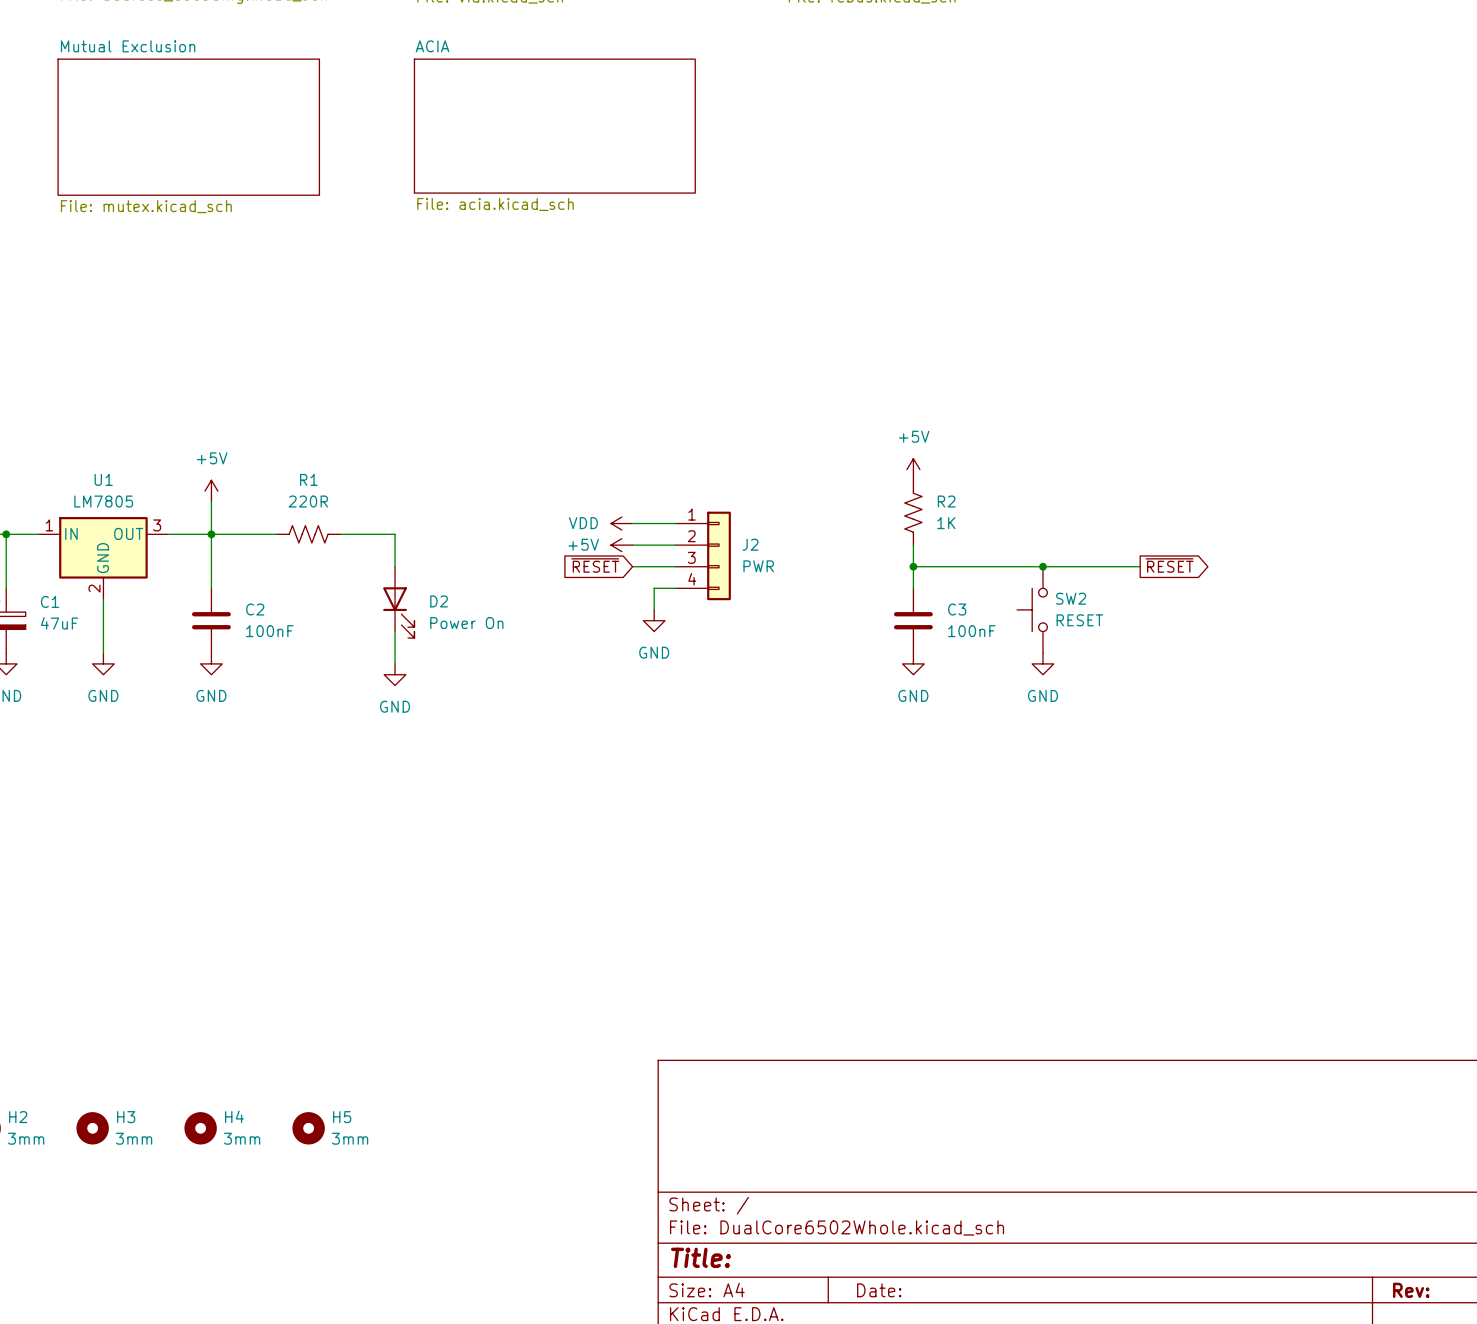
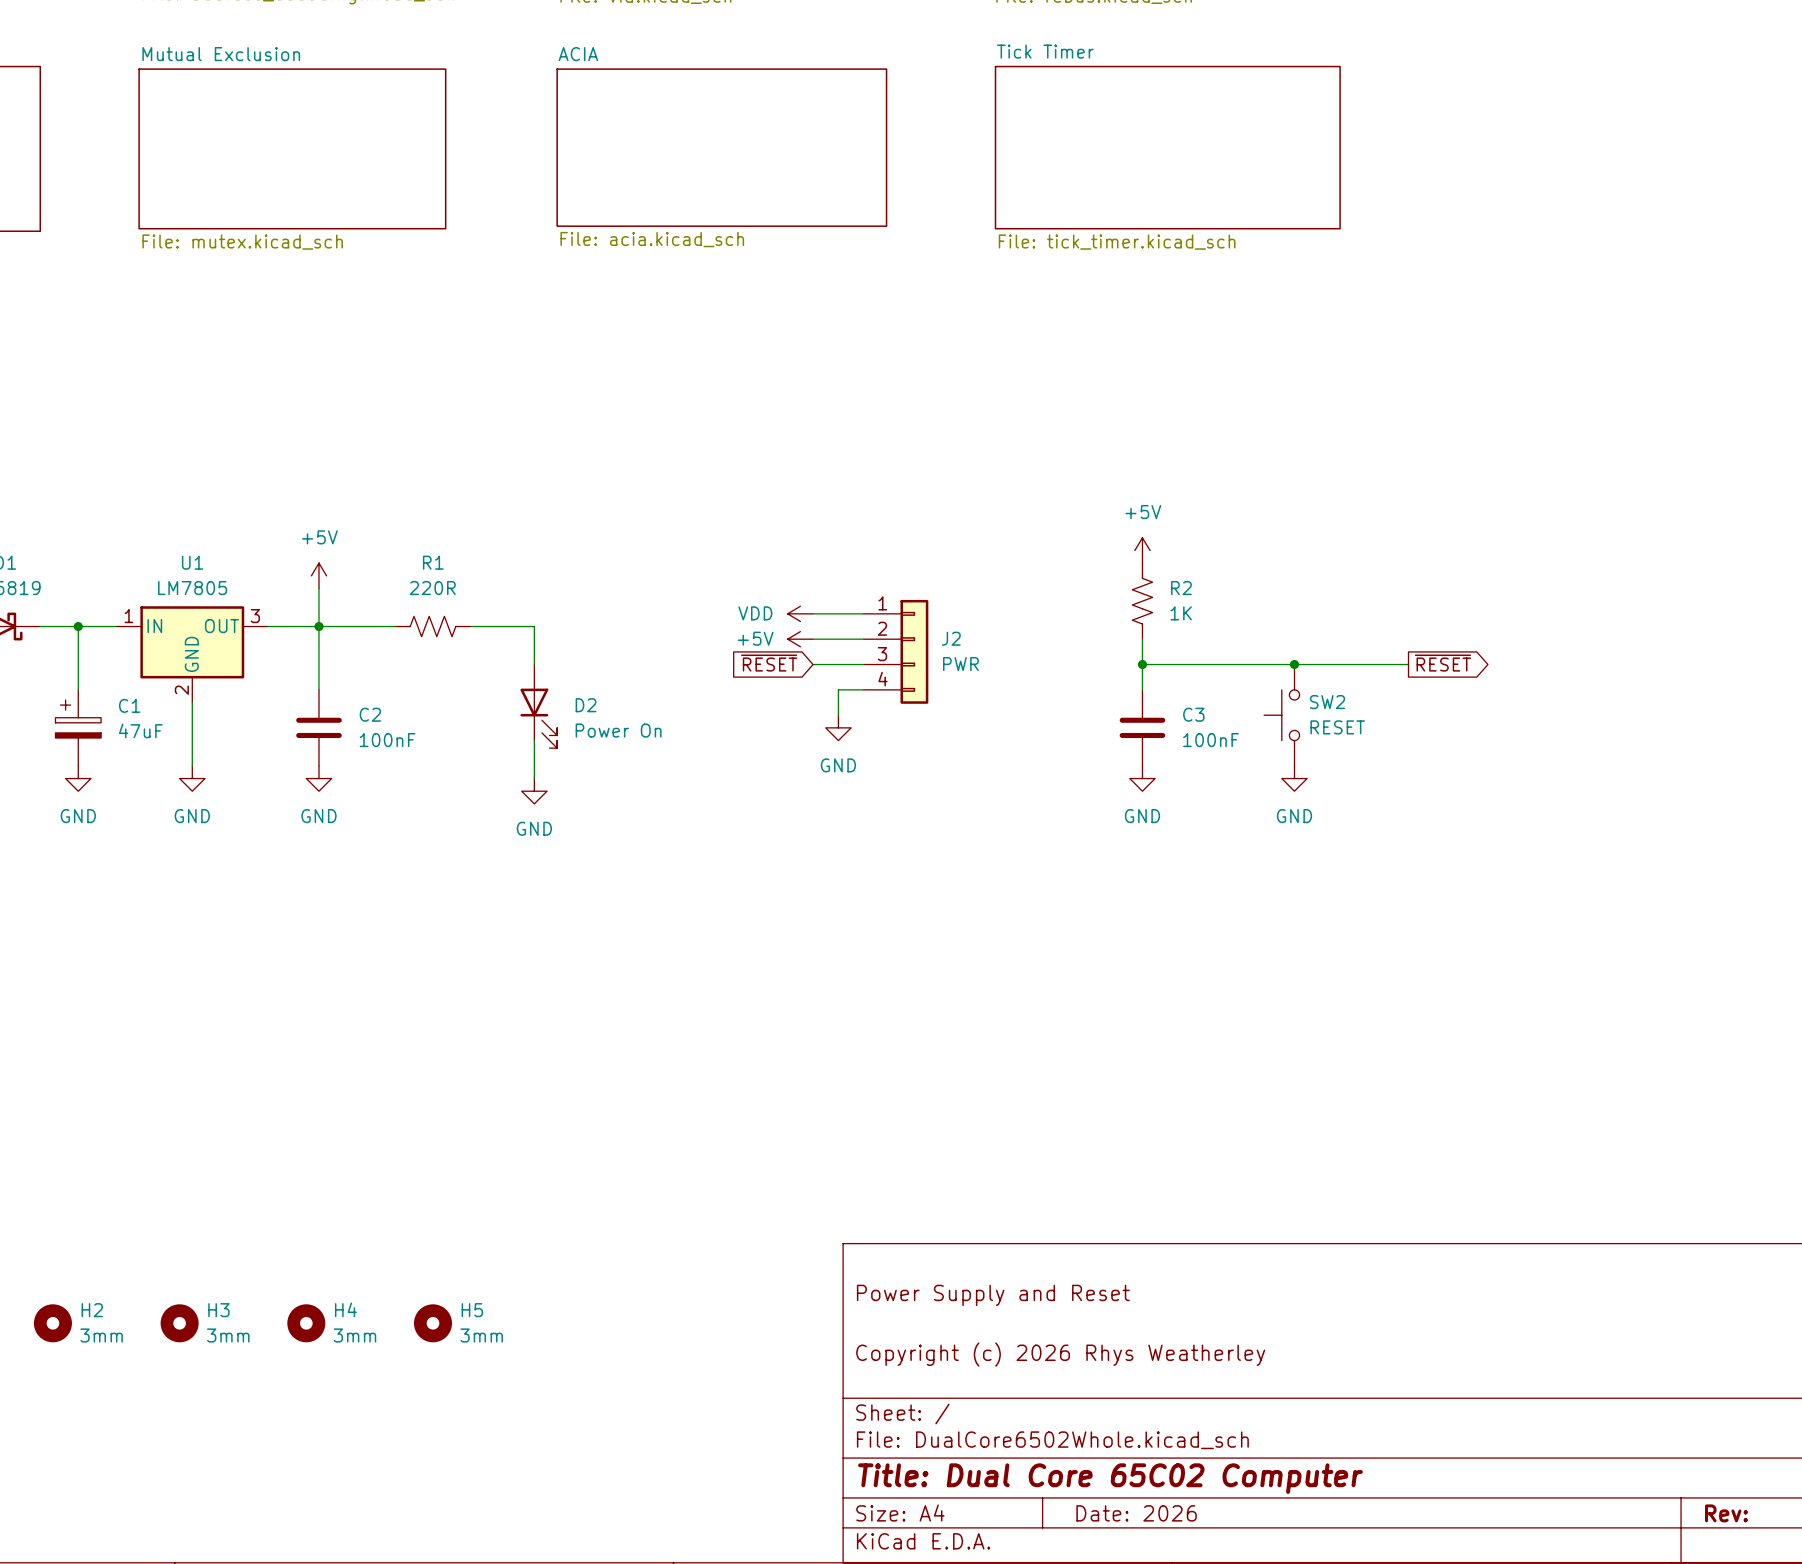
sheet Tick Timer: none -> File: tick_timer.kicad_sch (1167, 147)
title block: none -> Power Supply and Reset (993, 1295)
title block: none -> Copyright (c) 2026 Rhys Weatherley (1060, 1354)
title block: Title: (700, 1257) -> Title: Dual Core 65C02 Computer (1110, 1478)
title block: Date: (879, 1290) -> Date: 2026 (1136, 1513)

